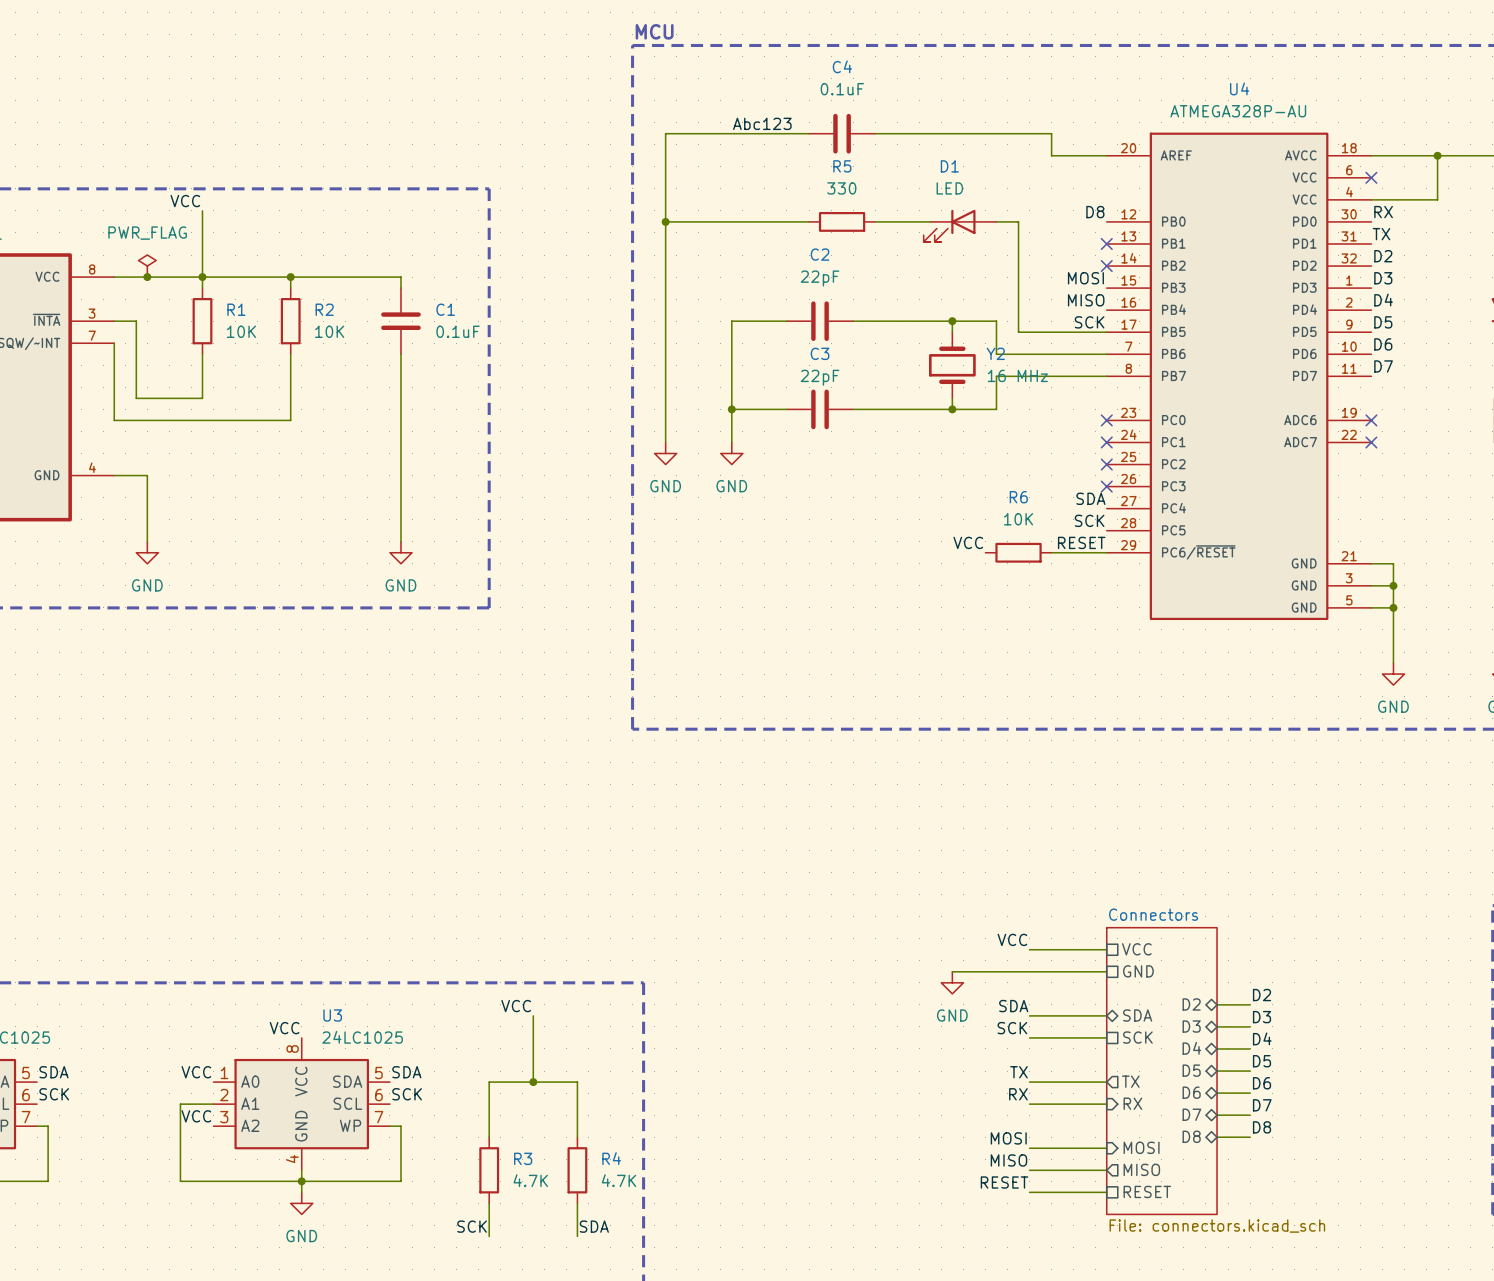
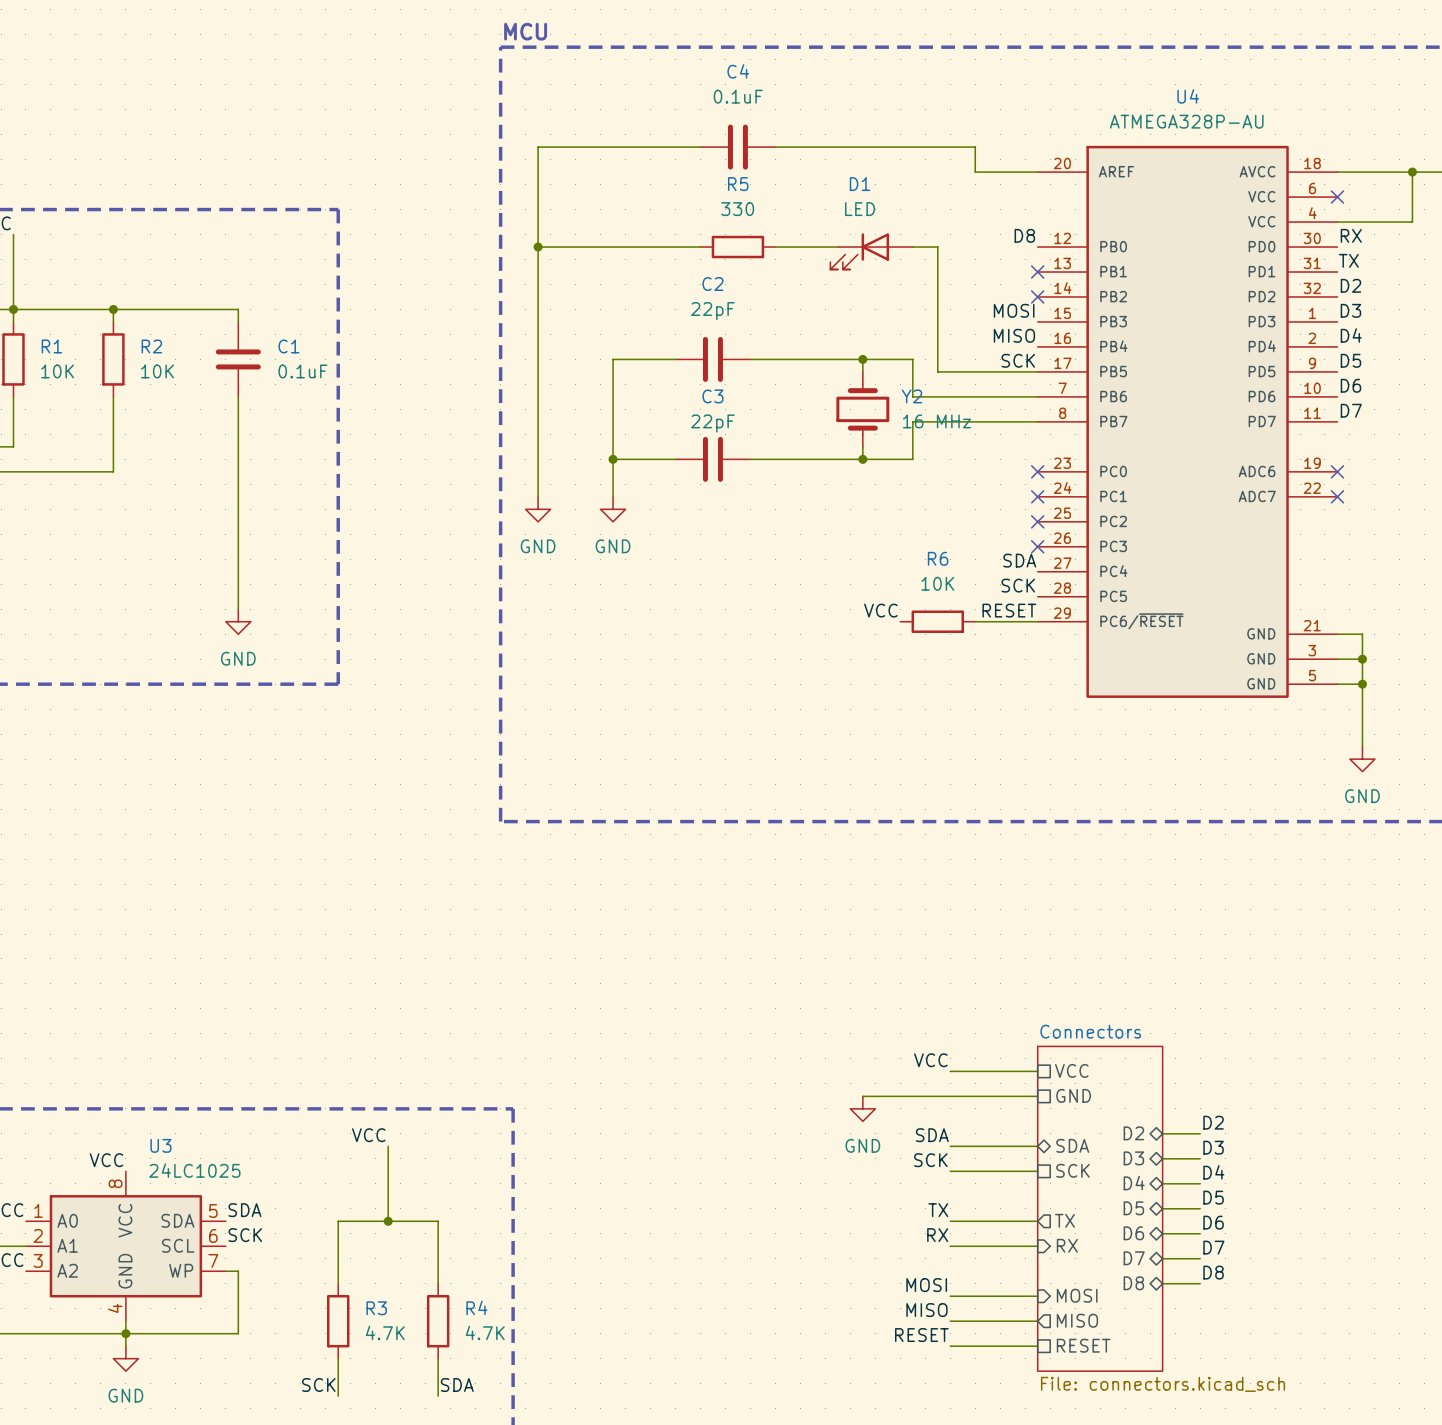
label: Abc123 (762, 123) -> none

